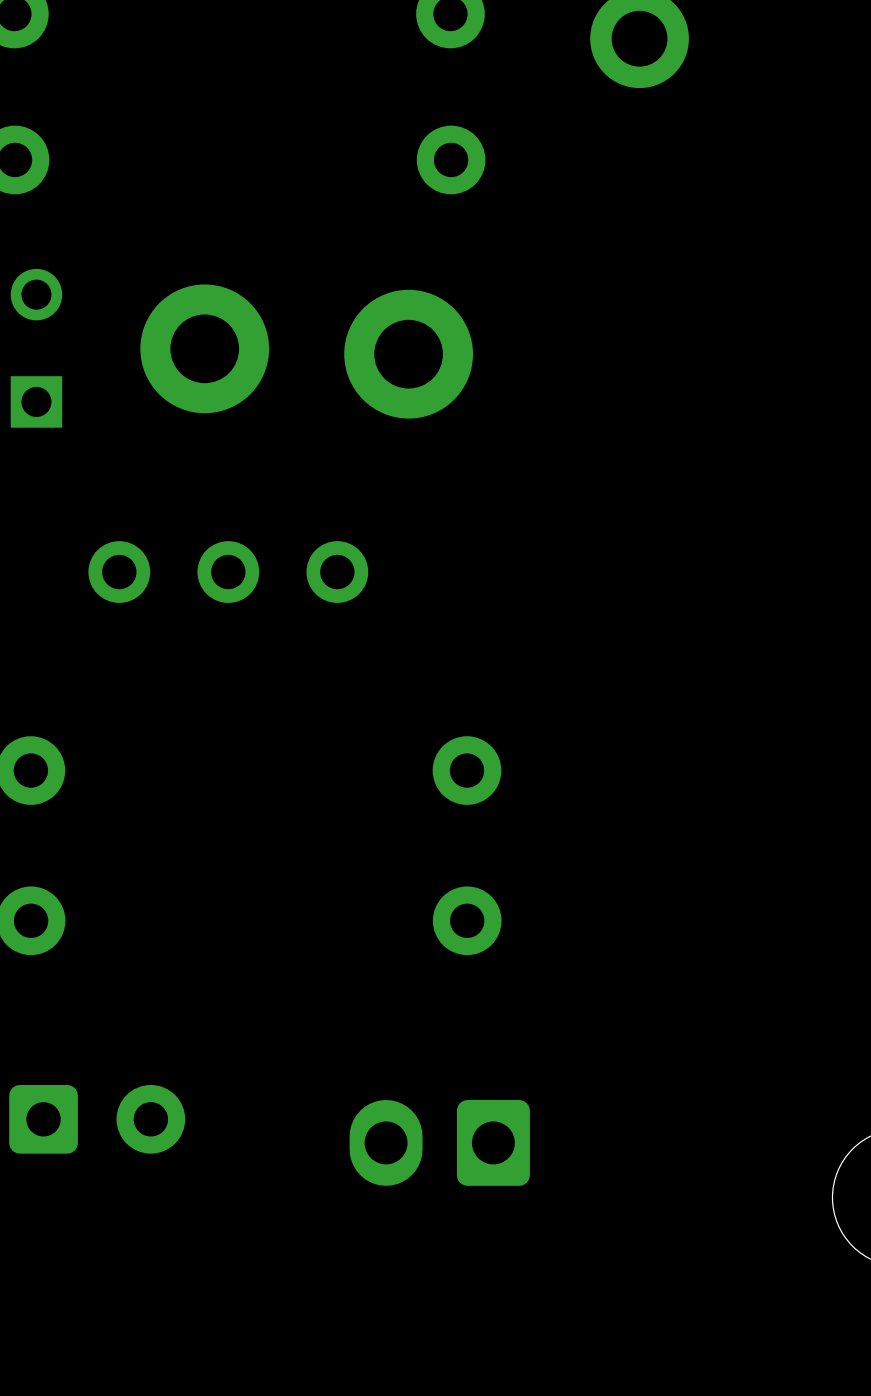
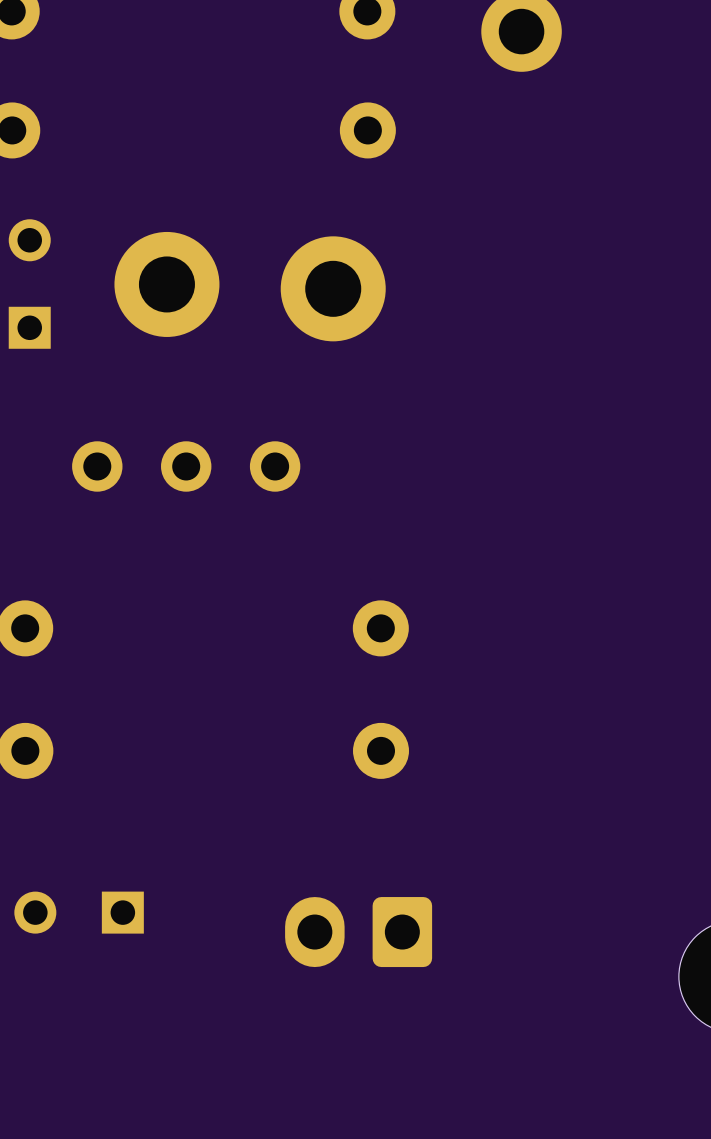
part footprint: [9, 1084, 186, 1154] -> [14, 891, 144, 934]

